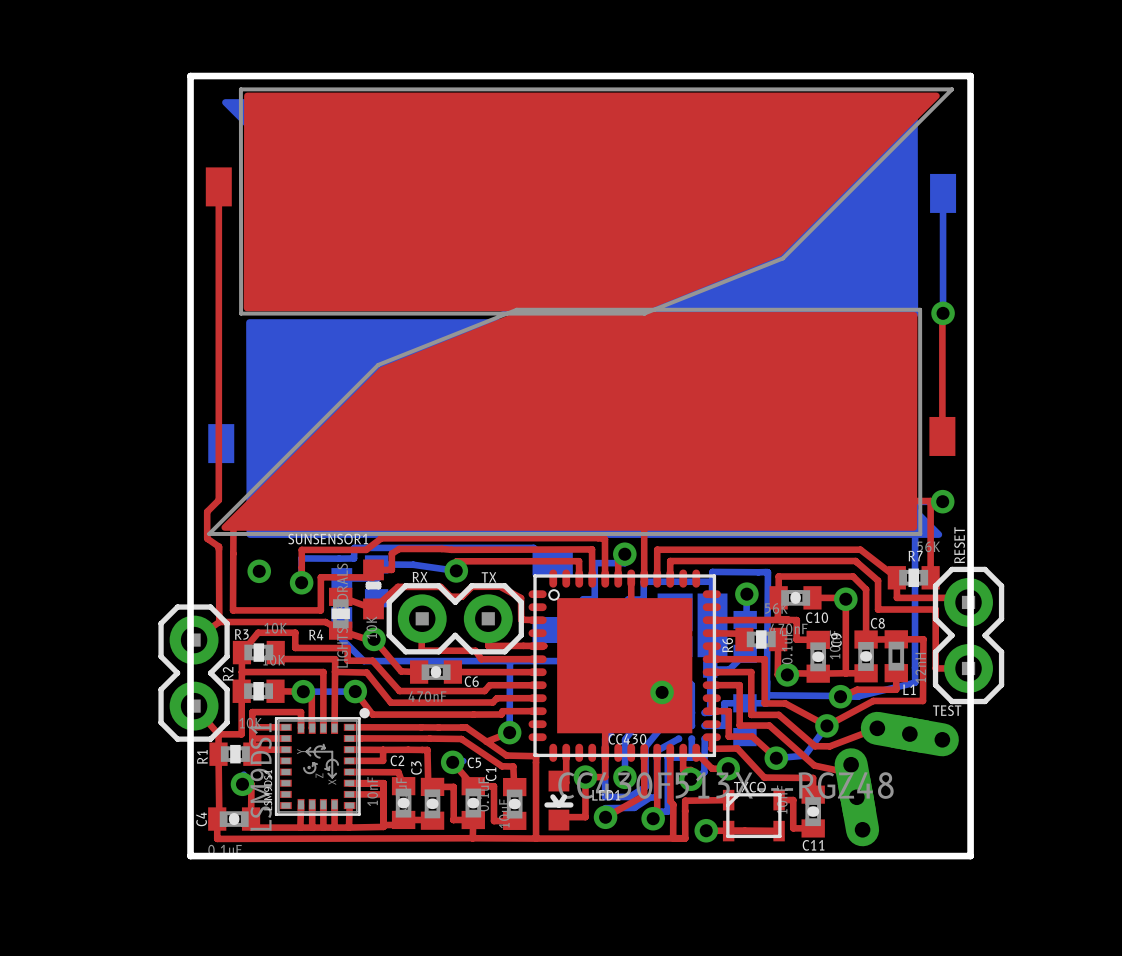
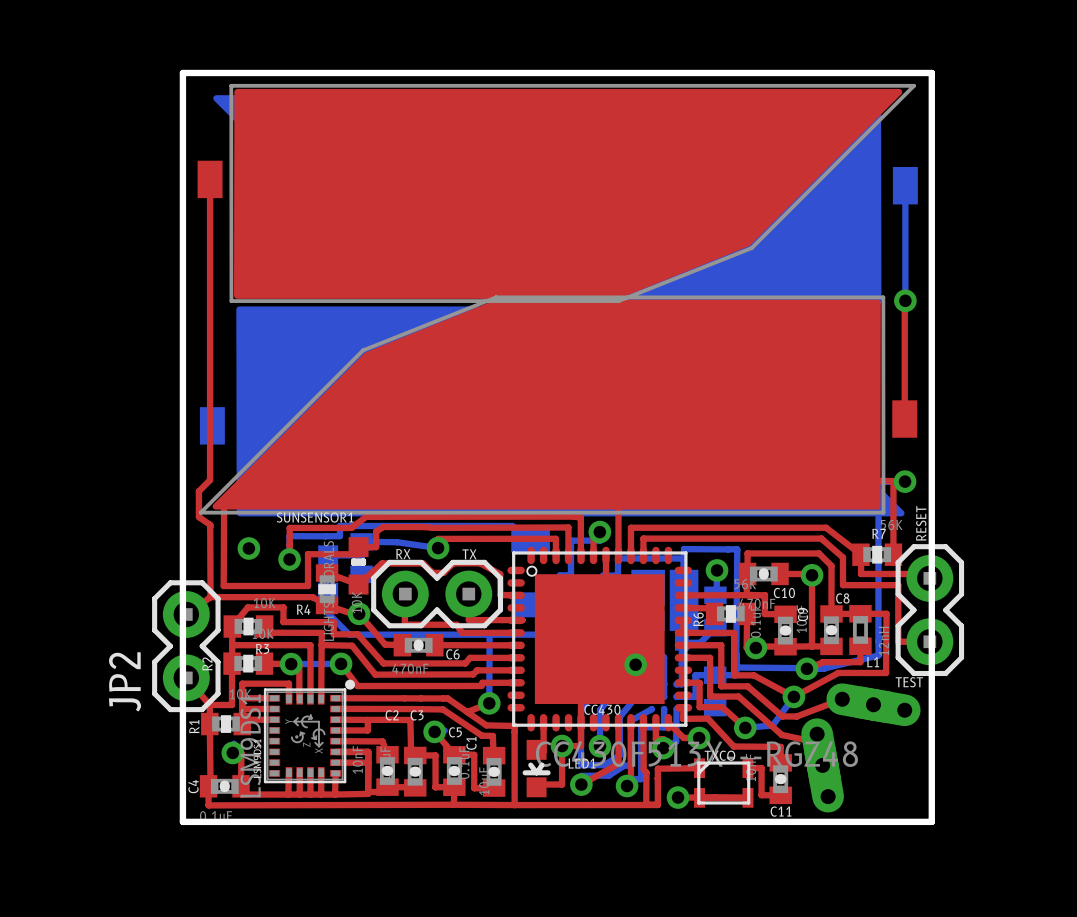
R3 name position: R3 (241, 634) -> R3 (262, 649)
R2 name position: R2 (228, 673) -> R2 (207, 663)
JP2 name: none -> JP2 (125, 681)
C2 name position: C2 (397, 760) -> C2 (392, 715)
C3 name rotation: 0° (416, 767) -> 90° clockwise (417, 715)
C3 name position: C3 (416, 767) -> C3 (417, 715)

